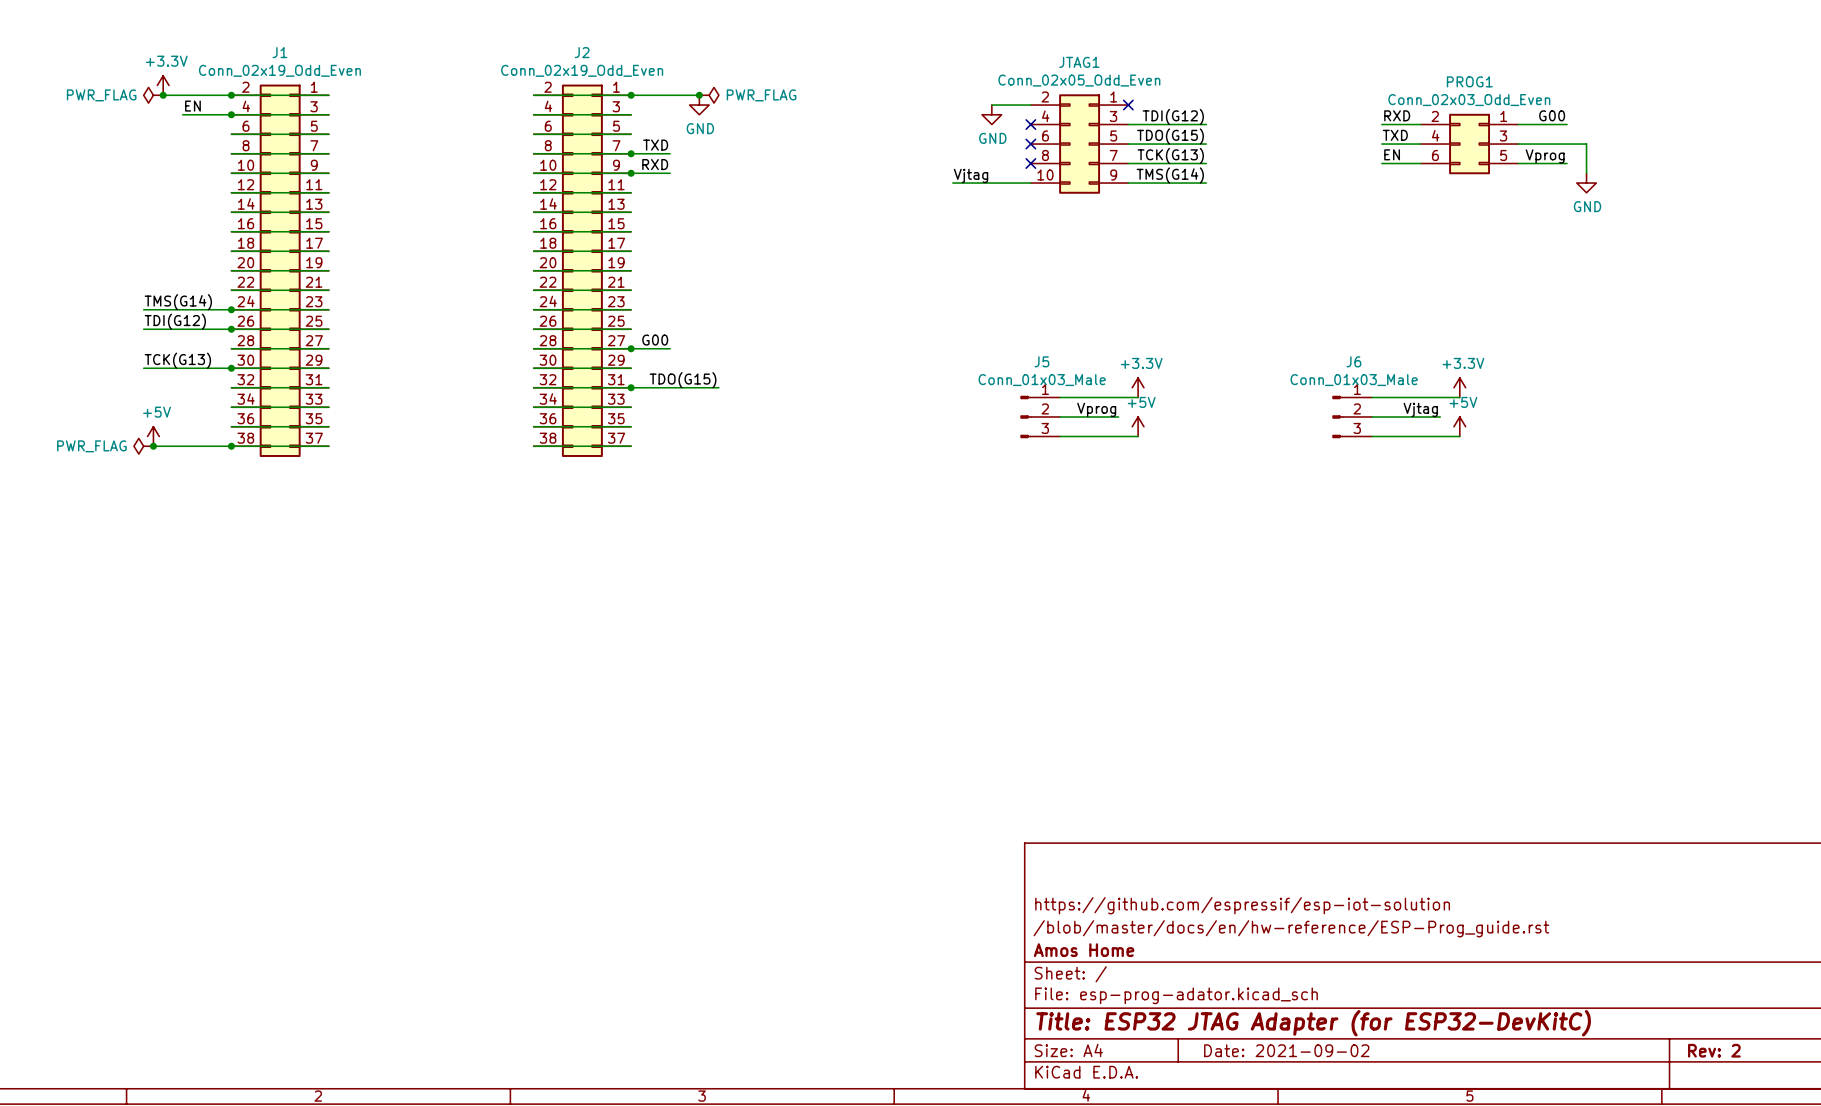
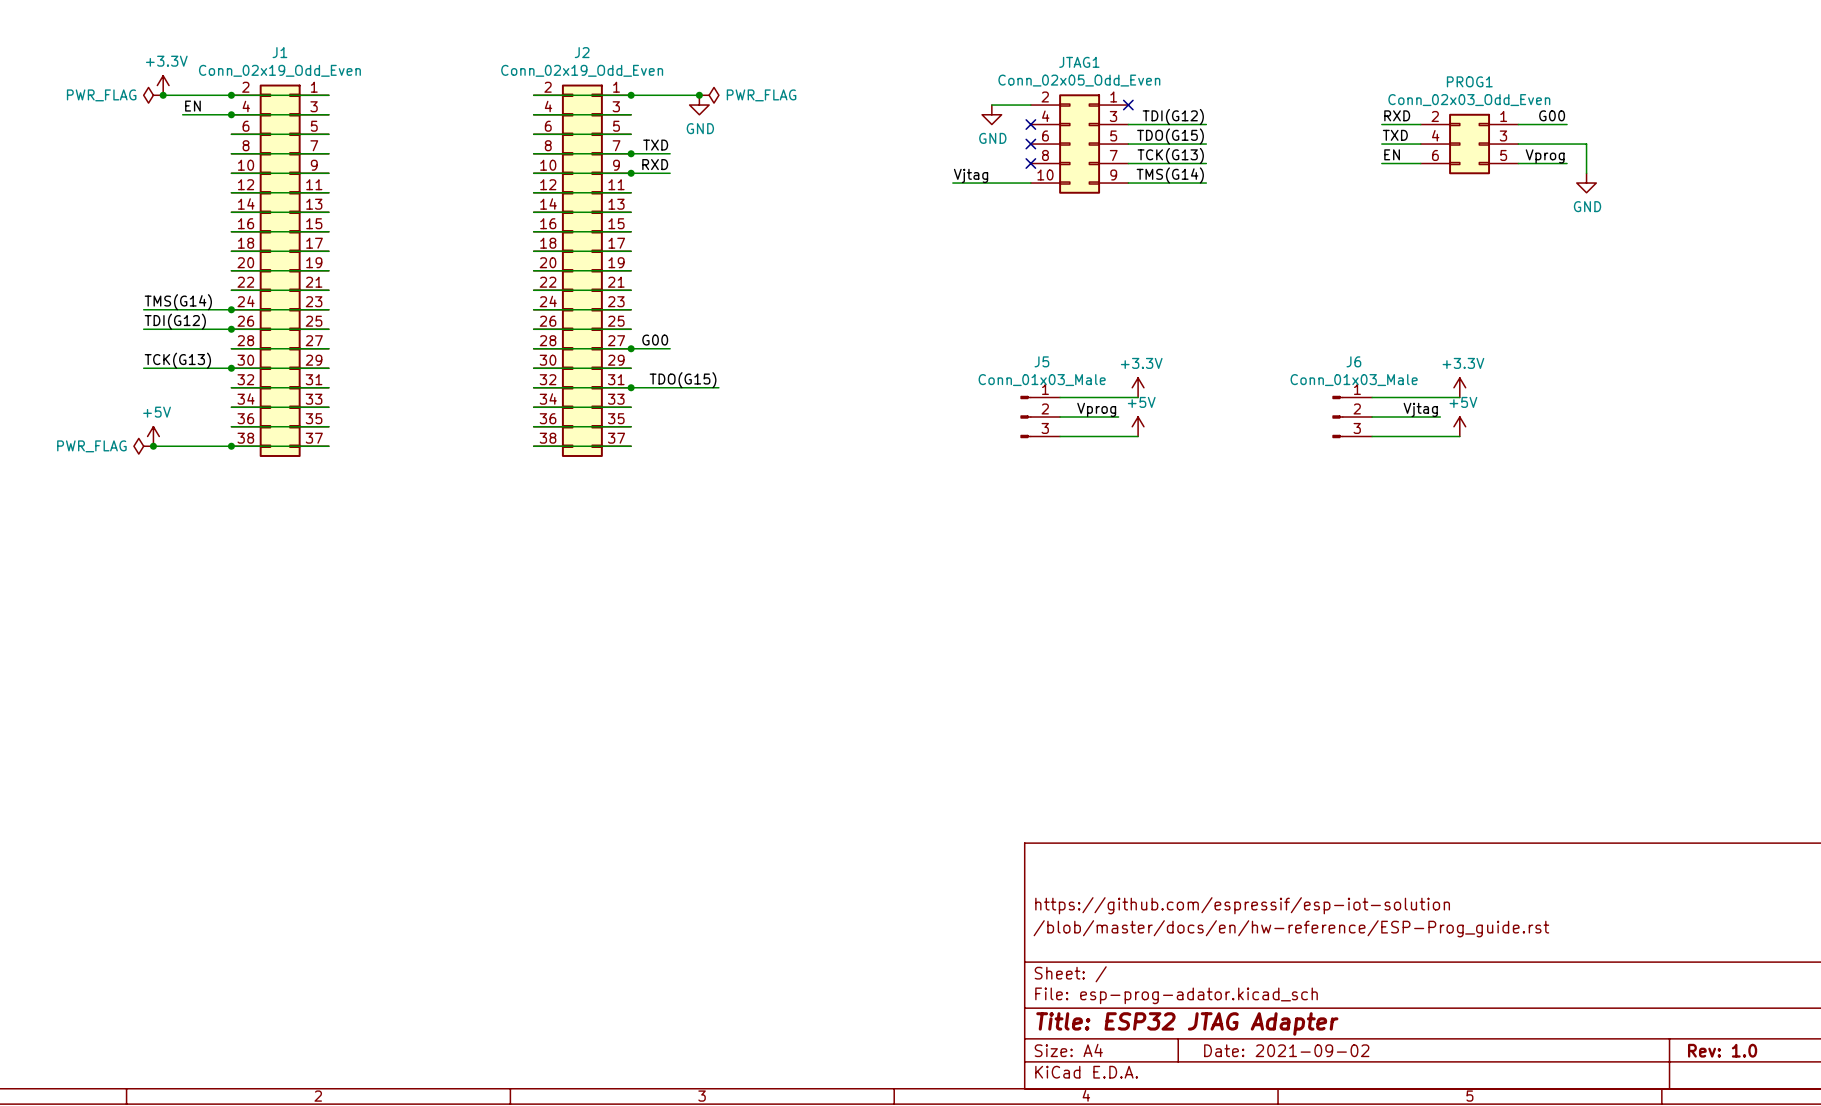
title block: Amos Home (1084, 950) -> none
title block: Title: ESP32 JTAG Adapter (for ESP32-DevKitC) (1313, 1023) -> Title: ESP32 JTAG Adapter (1187, 1023)
title block: Rev: 2 (1714, 1050) -> Rev: 1.0 (1722, 1050)

